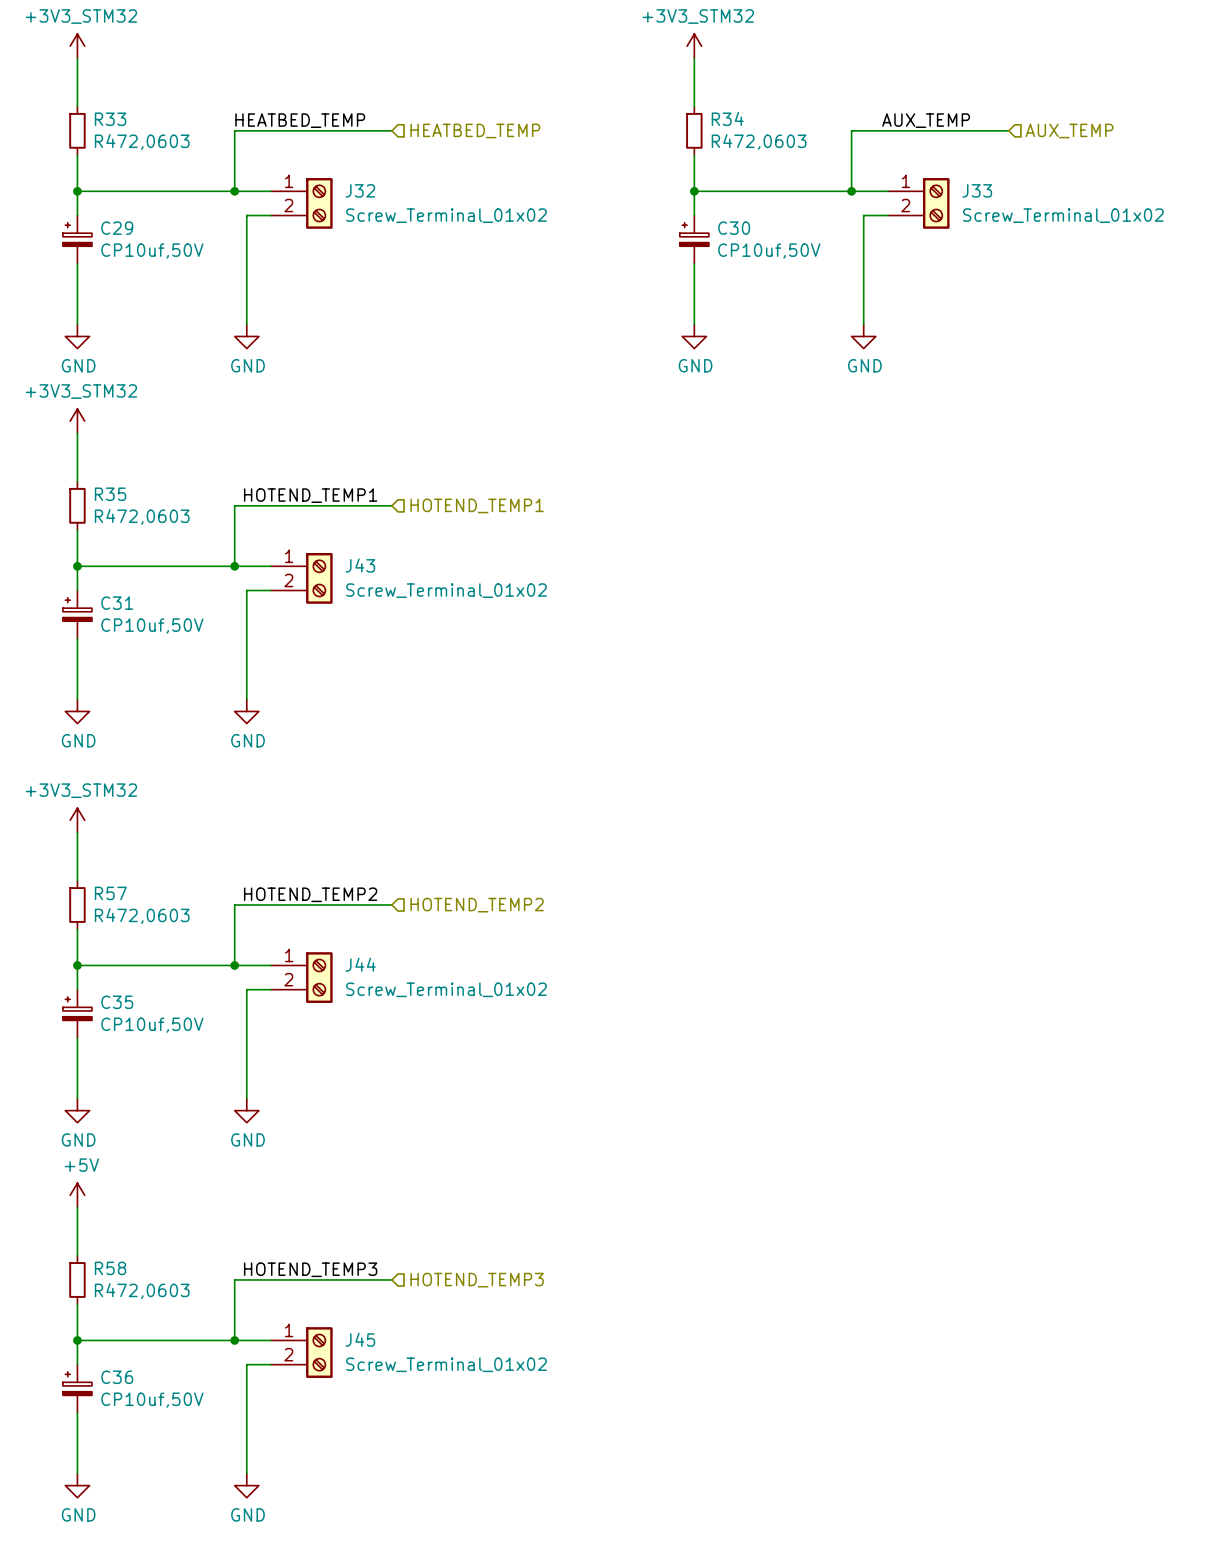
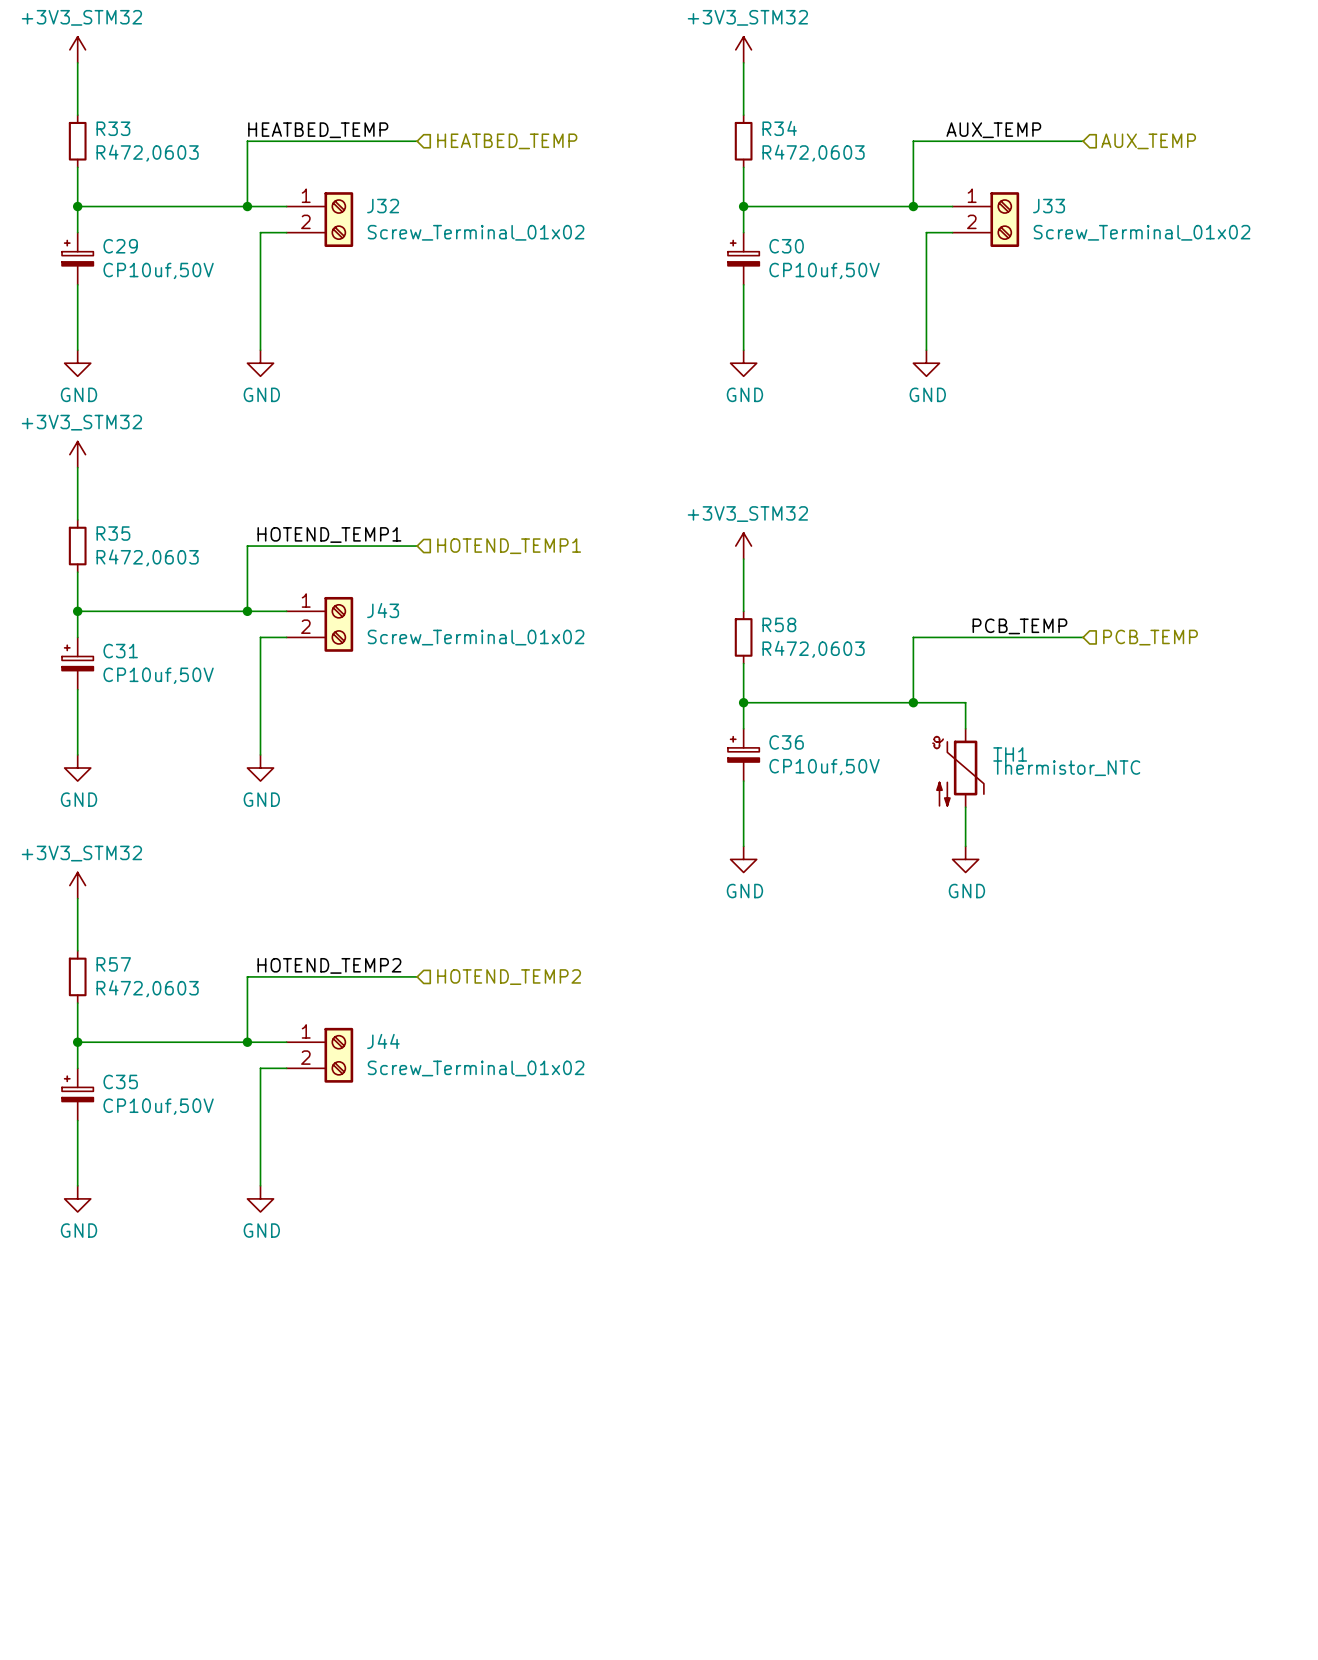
power symbol: none -> +3V3_STM32 (743, 546)
wire: none -> (743, 559) (743, 611)
label: none -> PCB_TEMP (1019, 626)
wire: none -> (1083, 637) (913, 637) (913, 702)
hierarchical label: none -> PCB_TEMP (1150, 637)
wire: none -> (743, 663) (743, 728)
wire: none -> (743, 702) (965, 702) (965, 728)
junction: none -> (743, 702)
junction: none -> (913, 702)
TH1: none -> Thermistor_NTC (958, 768)
wire: none -> (743, 781) (743, 846)
wire: none -> (965, 807) (965, 846)
power symbol: none -> GND (743, 859)
power symbol: none -> GND (965, 859)
power symbol: +5V (77, 1195) -> none
wire: (77, 1207) (77, 1255) -> none
label: HOTEND_TEMP3 (310, 1269) -> none
R58 position: (77, 1279) -> (743, 637)
wire: (391, 1279) (234, 1279) (234, 1340) -> none
hierarchical label: HOTEND_TEMP3 (477, 1280) -> none
wire: (77, 1304) (77, 1364) -> none
wire: (77, 1340) (270, 1340) -> none
junction: (77, 1340) -> none
junction: (234, 1340) -> none
J45: Screw_Terminal_01x02 (301, 1352) -> none
wire: (270, 1364) (246, 1364) (246, 1473) -> none
C36 position: (77, 1388) -> (743, 754)
wire: (77, 1413) (77, 1473) -> none
power symbol: GND (77, 1485) -> none
power symbol: GND (246, 1485) -> none

